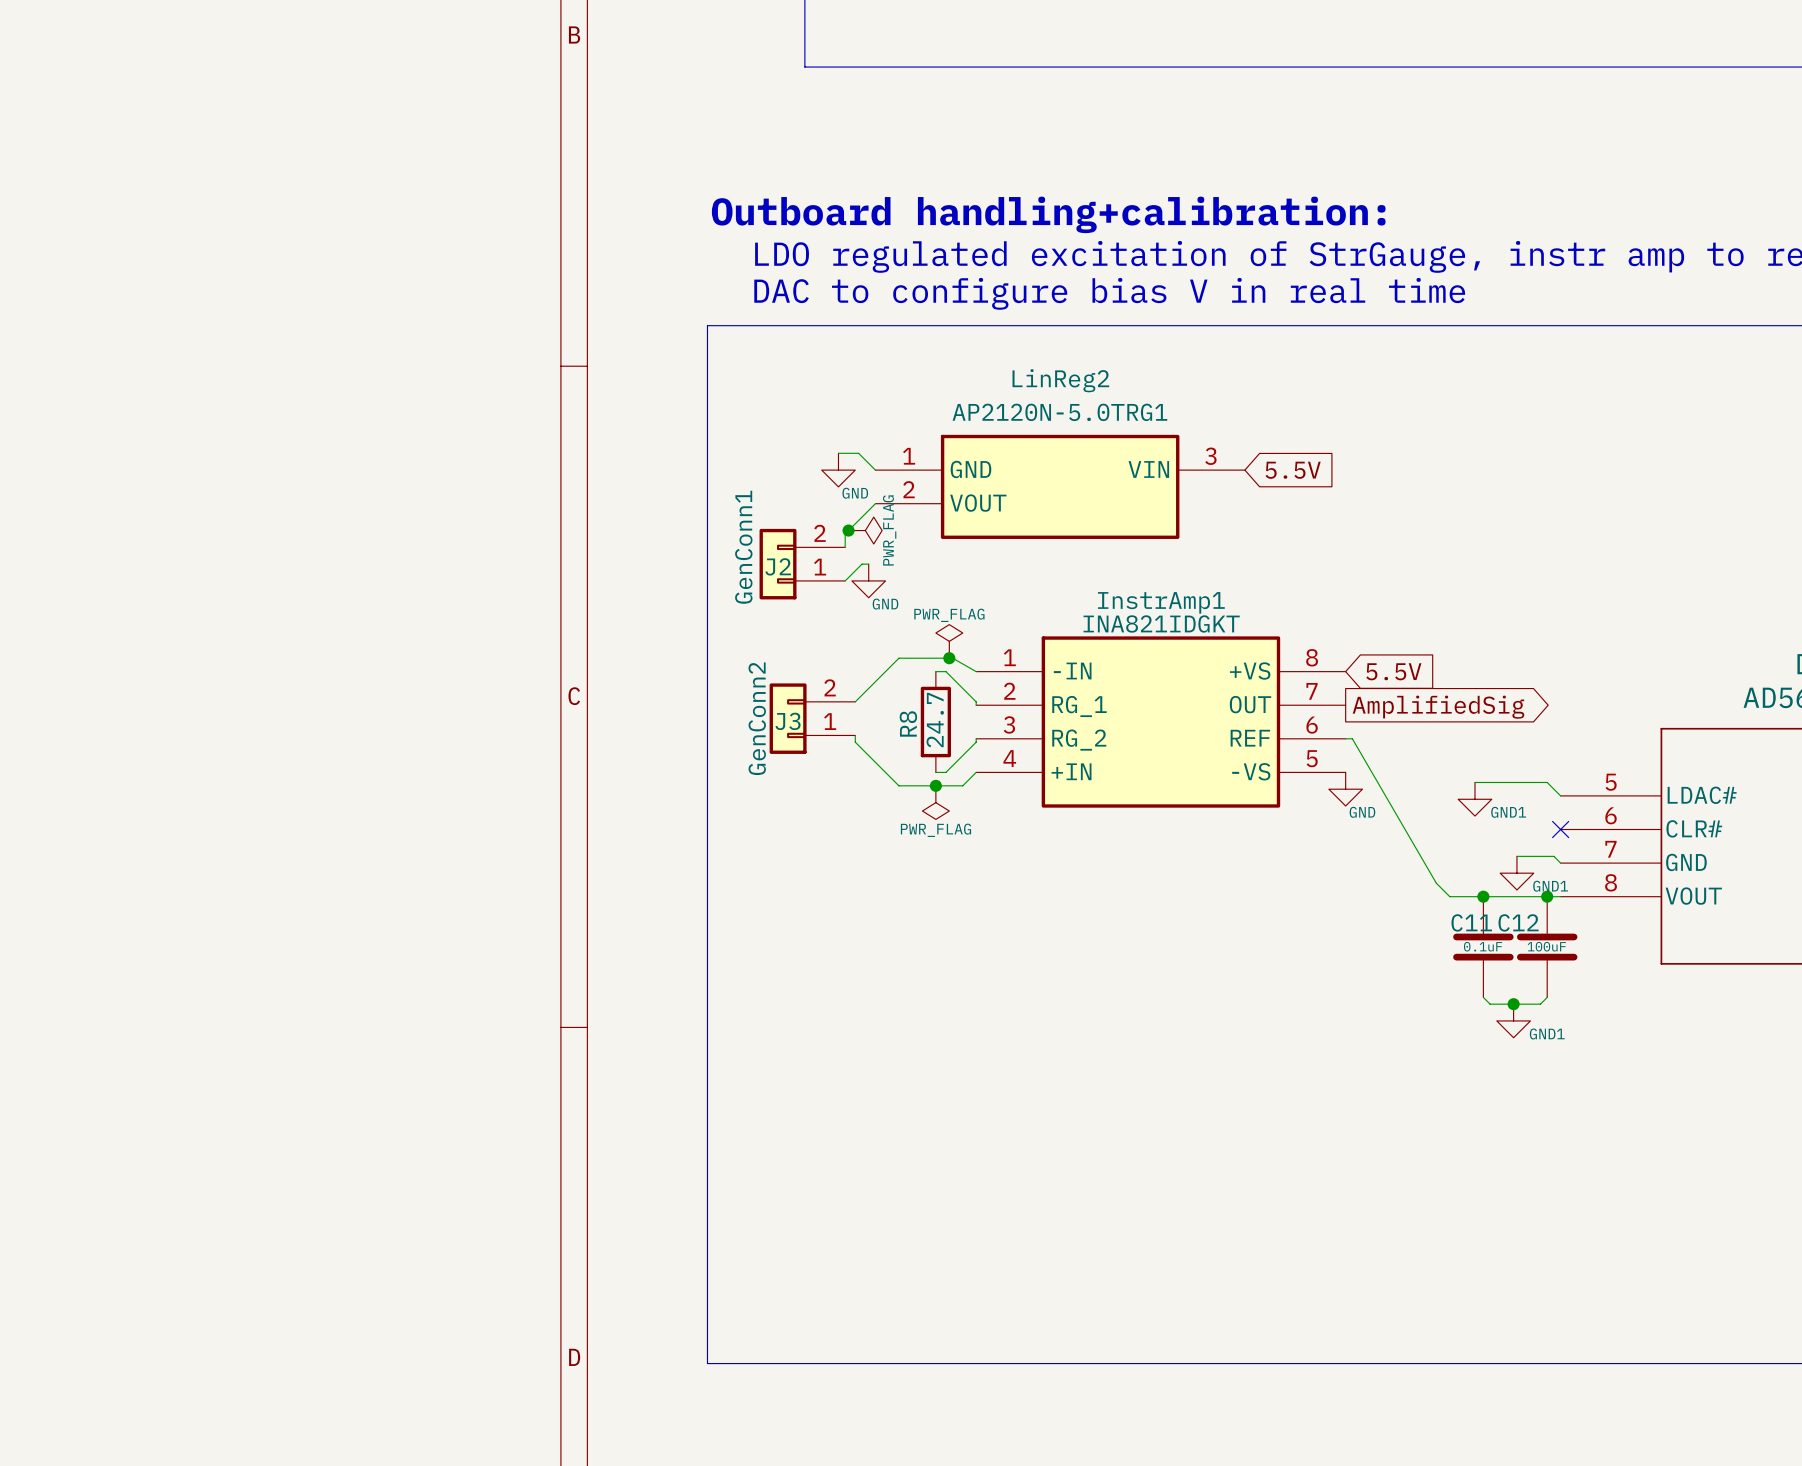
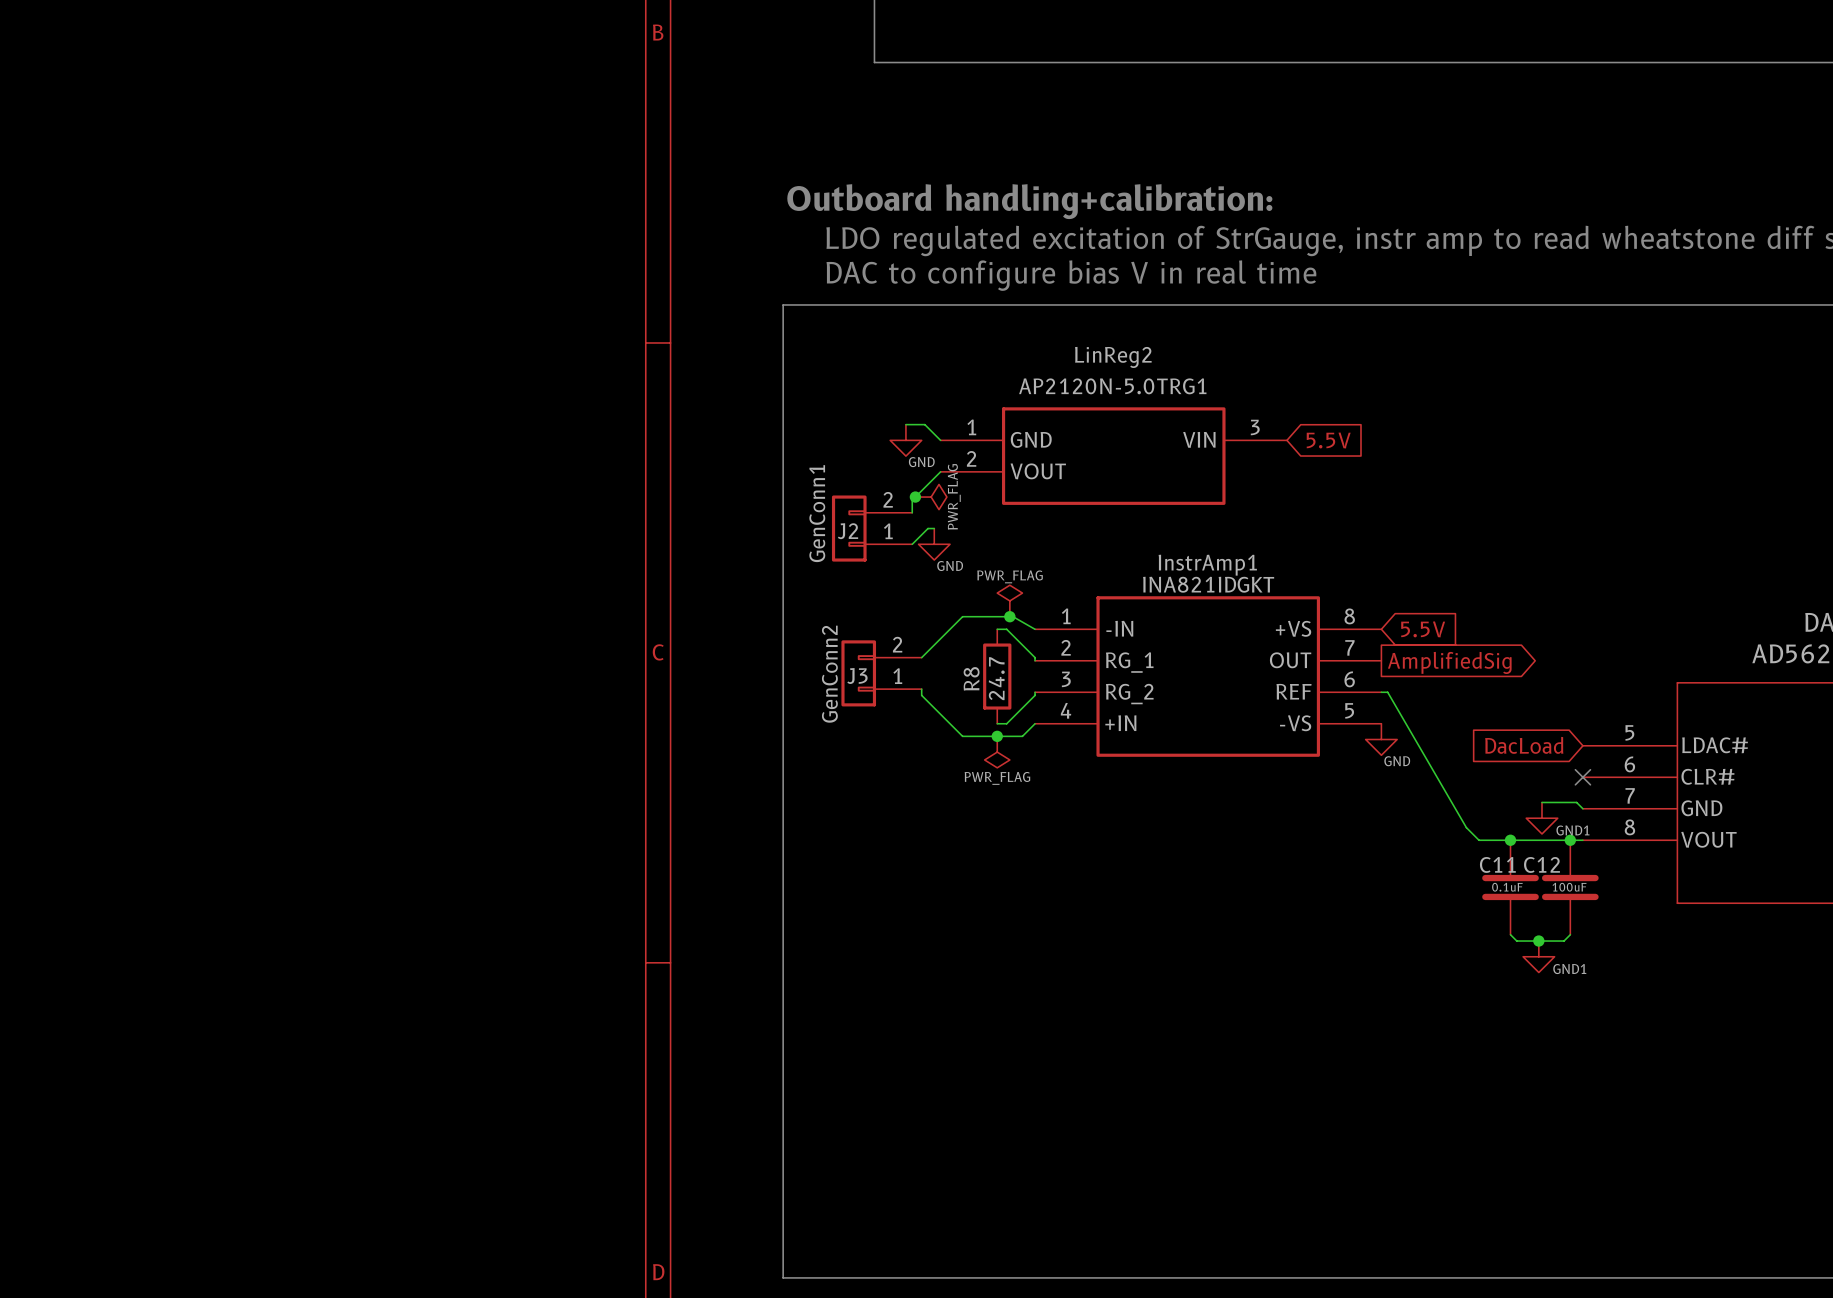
wire: (1474, 782) (1547, 782) (1560, 795) -> none
global label: none -> DacLoad (1524, 745)
power symbol: GND1 (1474, 799) -> none

